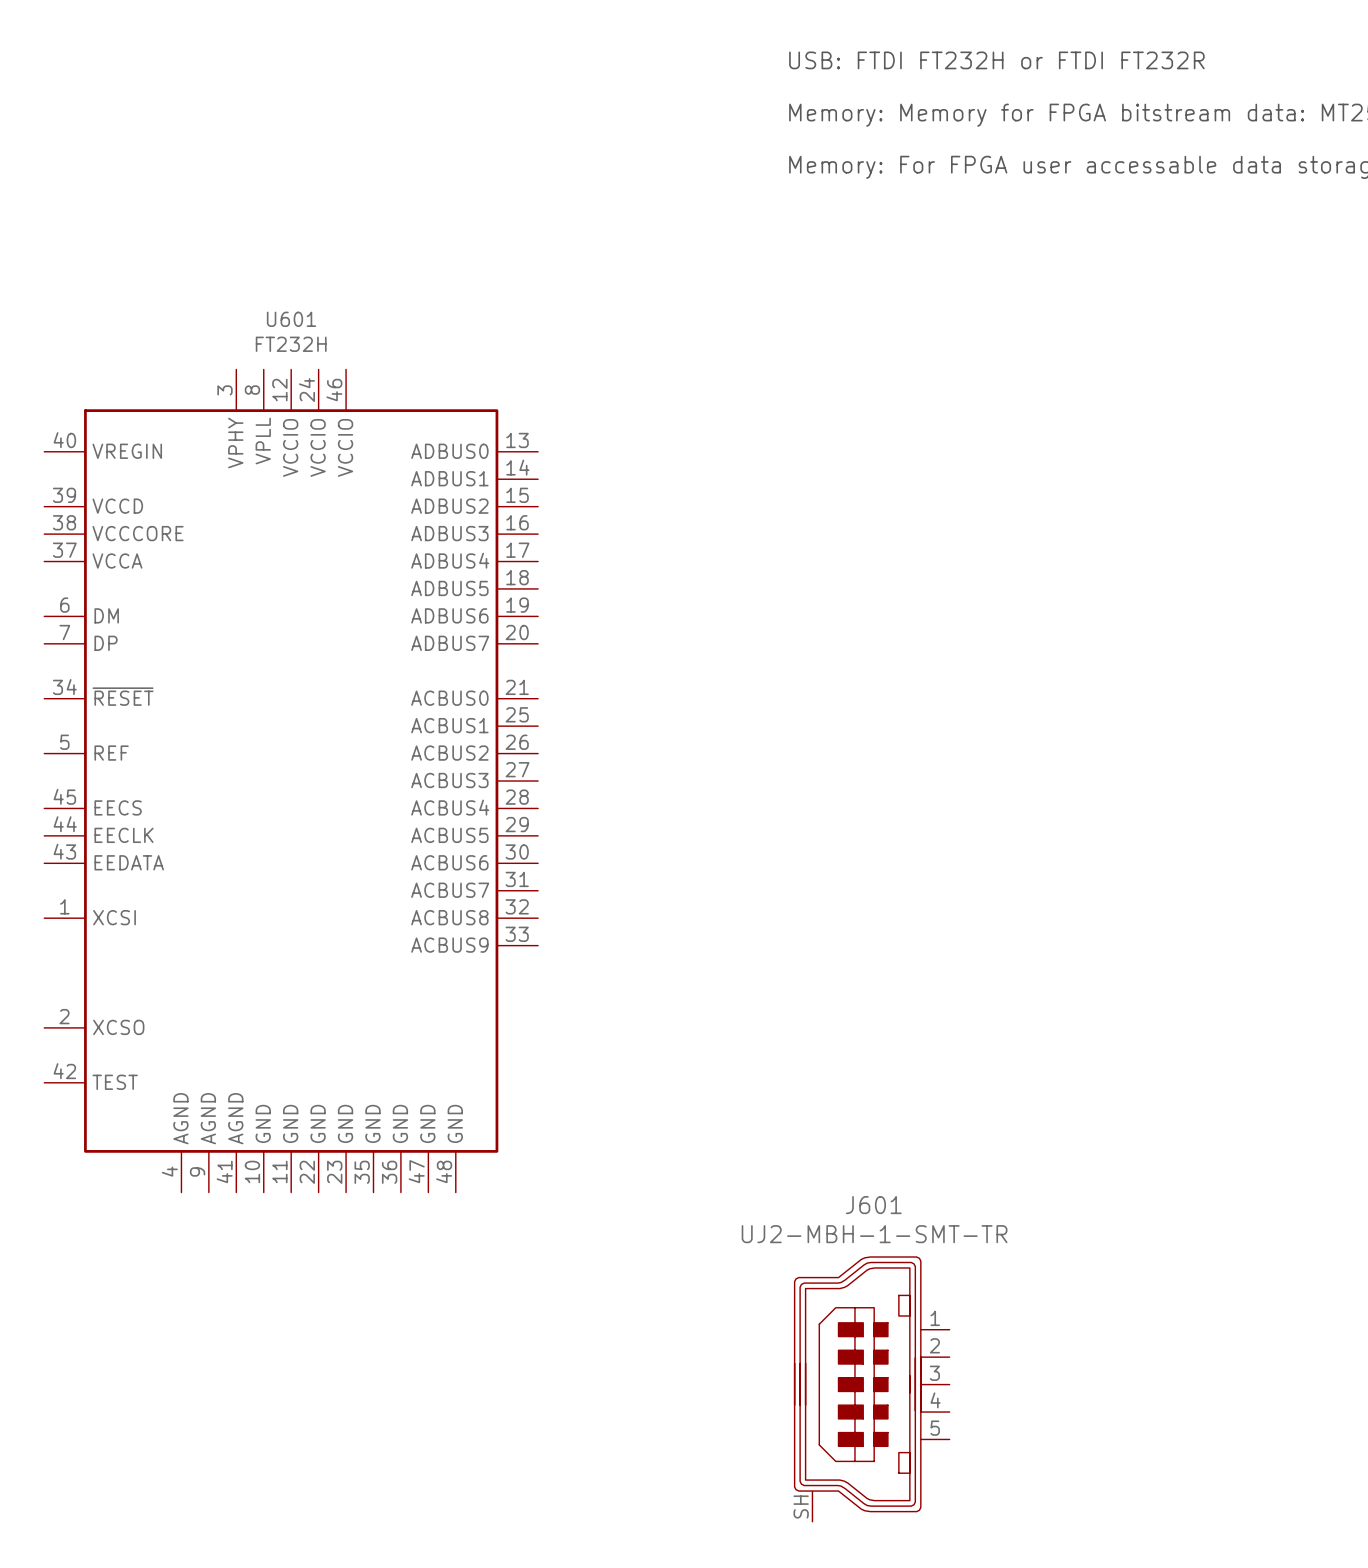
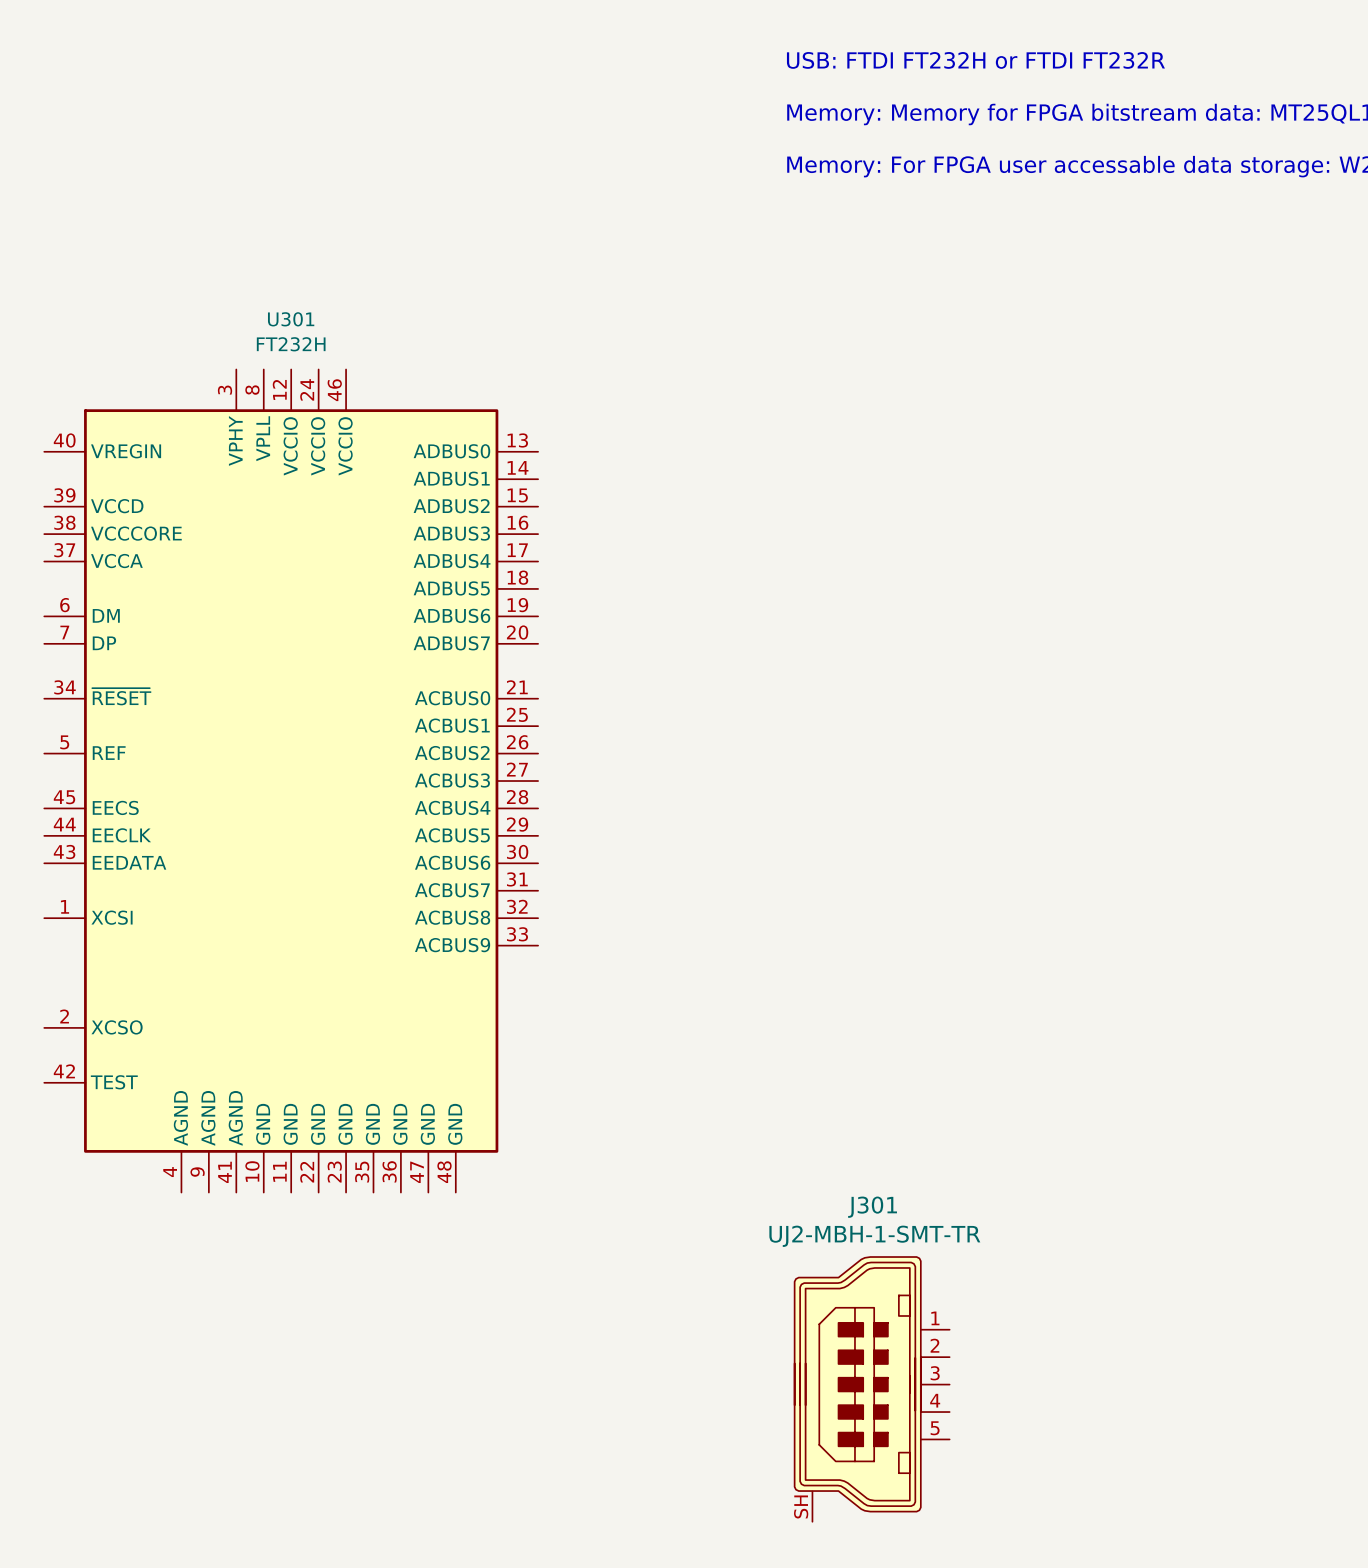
U601 name: U601 (291, 319) -> U301 (291, 319)
J601 name: J601 (873, 1205) -> J301 (872, 1207)

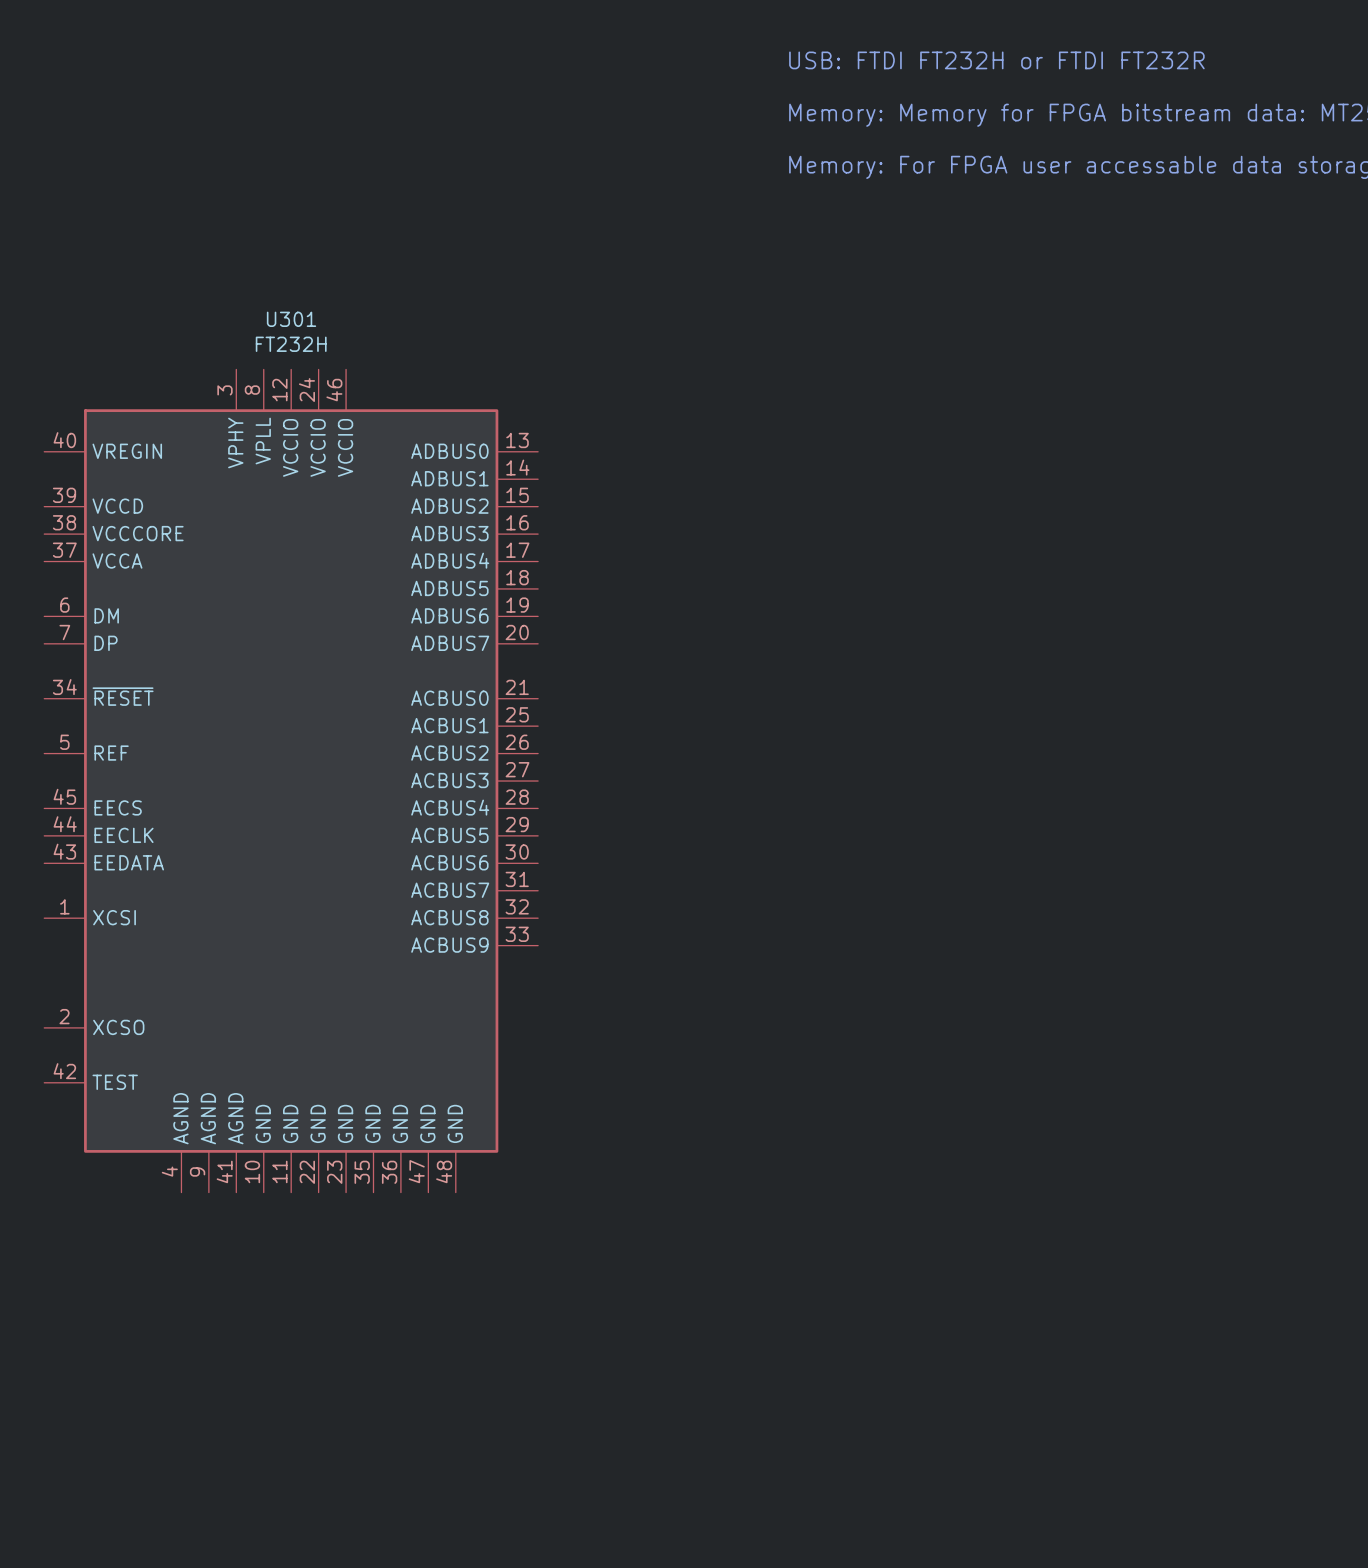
J301: UJ2-MBH-1-SMT-TR (872, 1389) -> none

